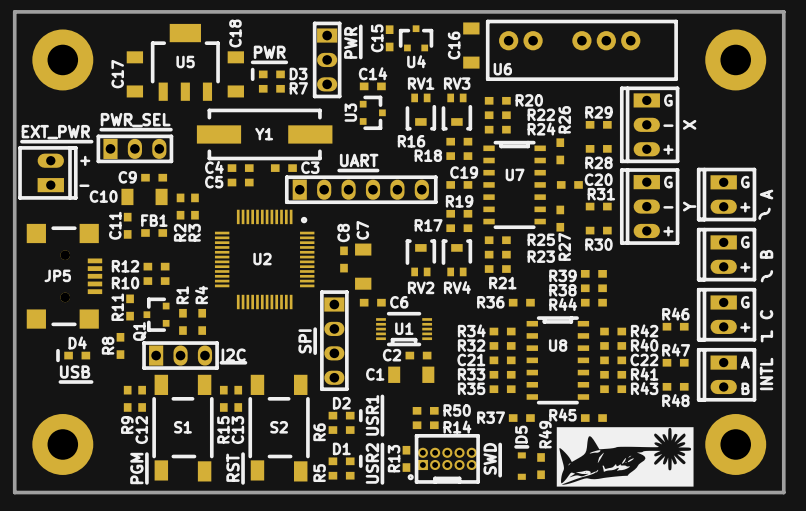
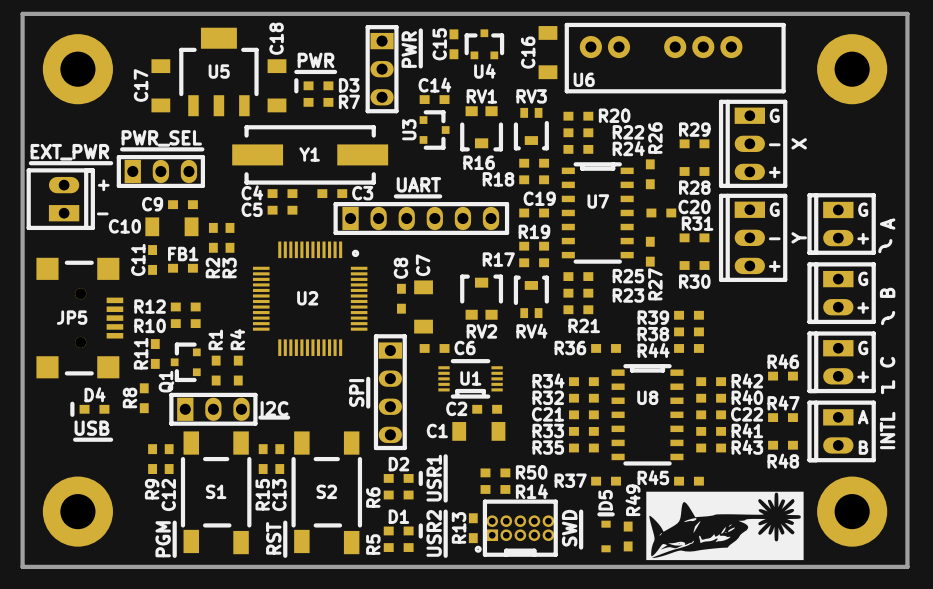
RV1 footprint: [405, 93, 437, 131] -> [460, 106, 504, 152]
RV2 footprint: [405, 239, 437, 277] -> [460, 274, 504, 320]

